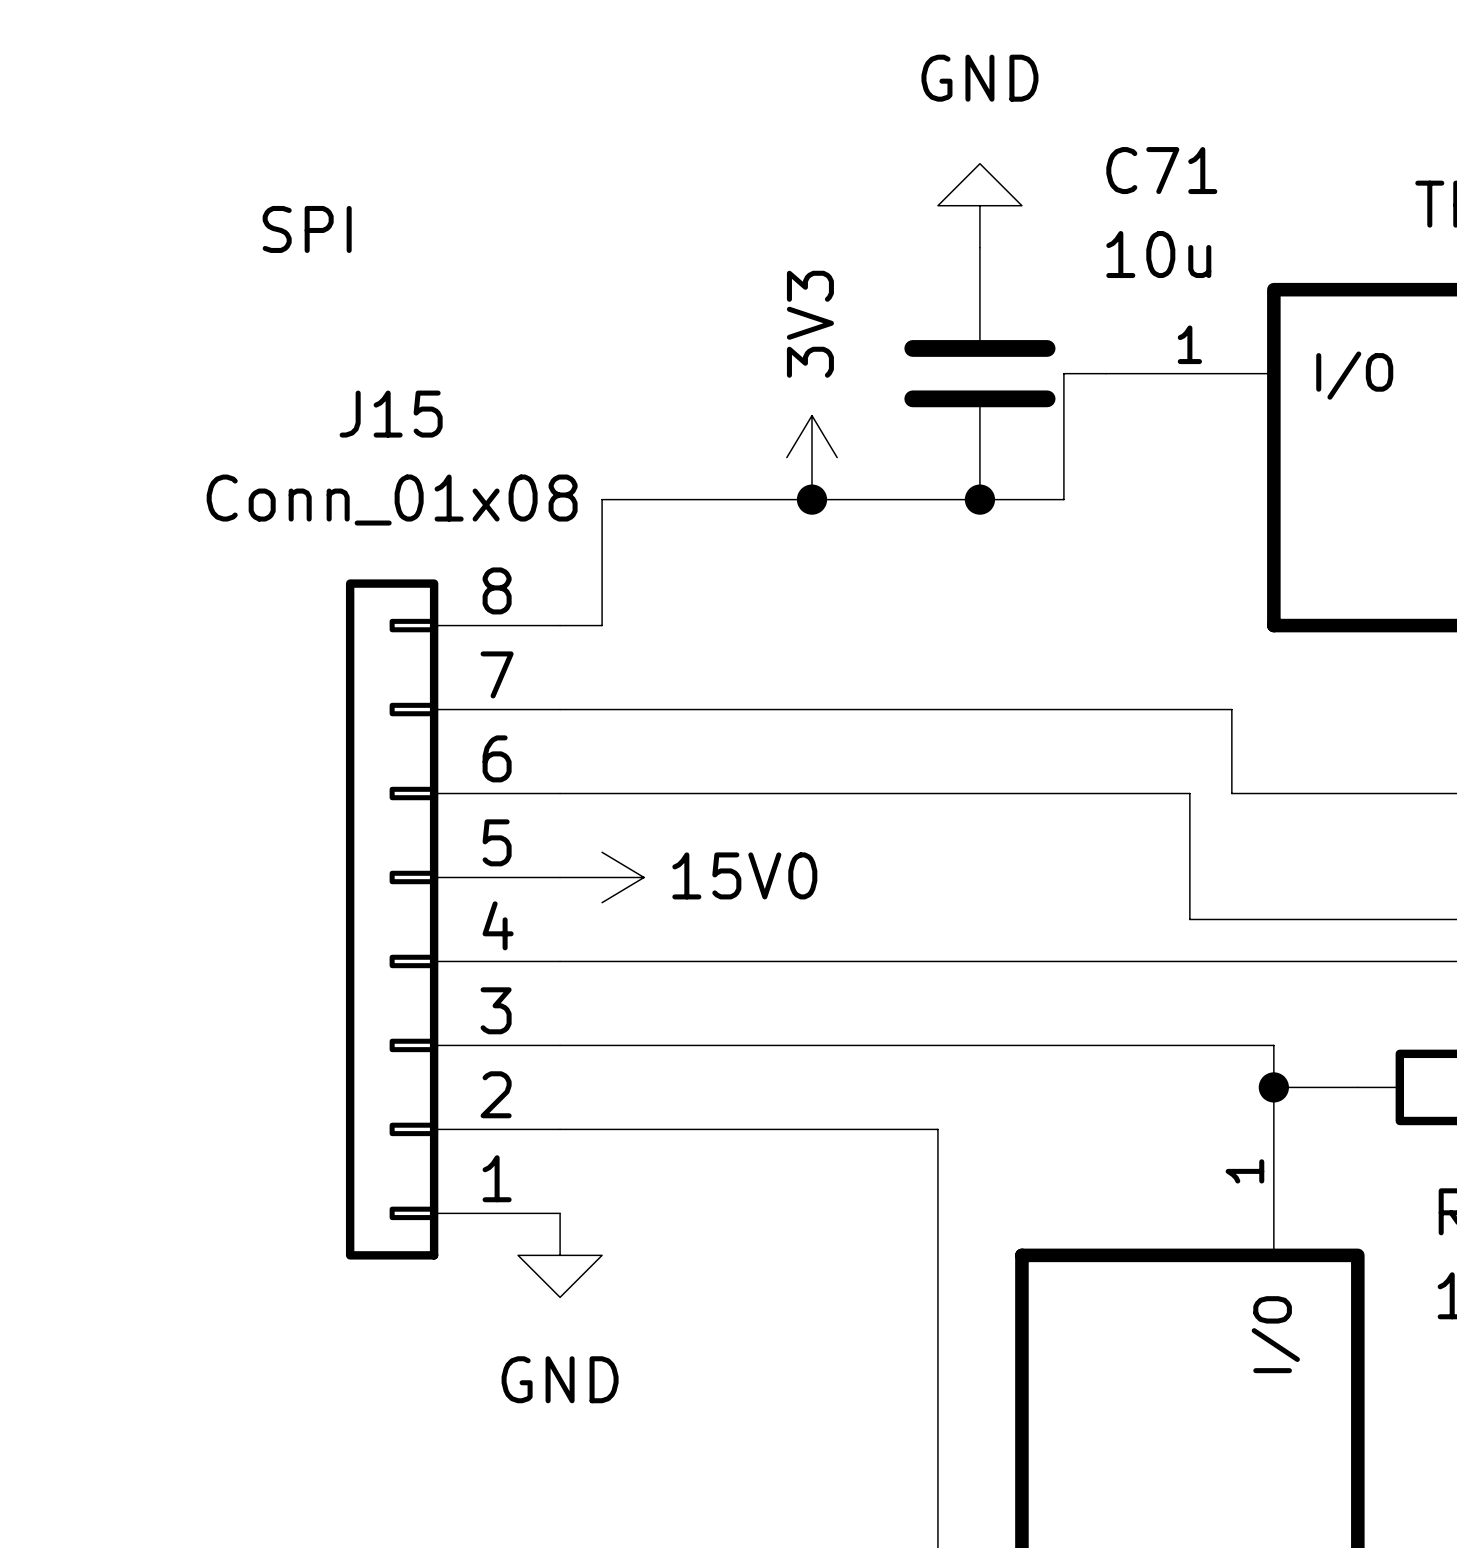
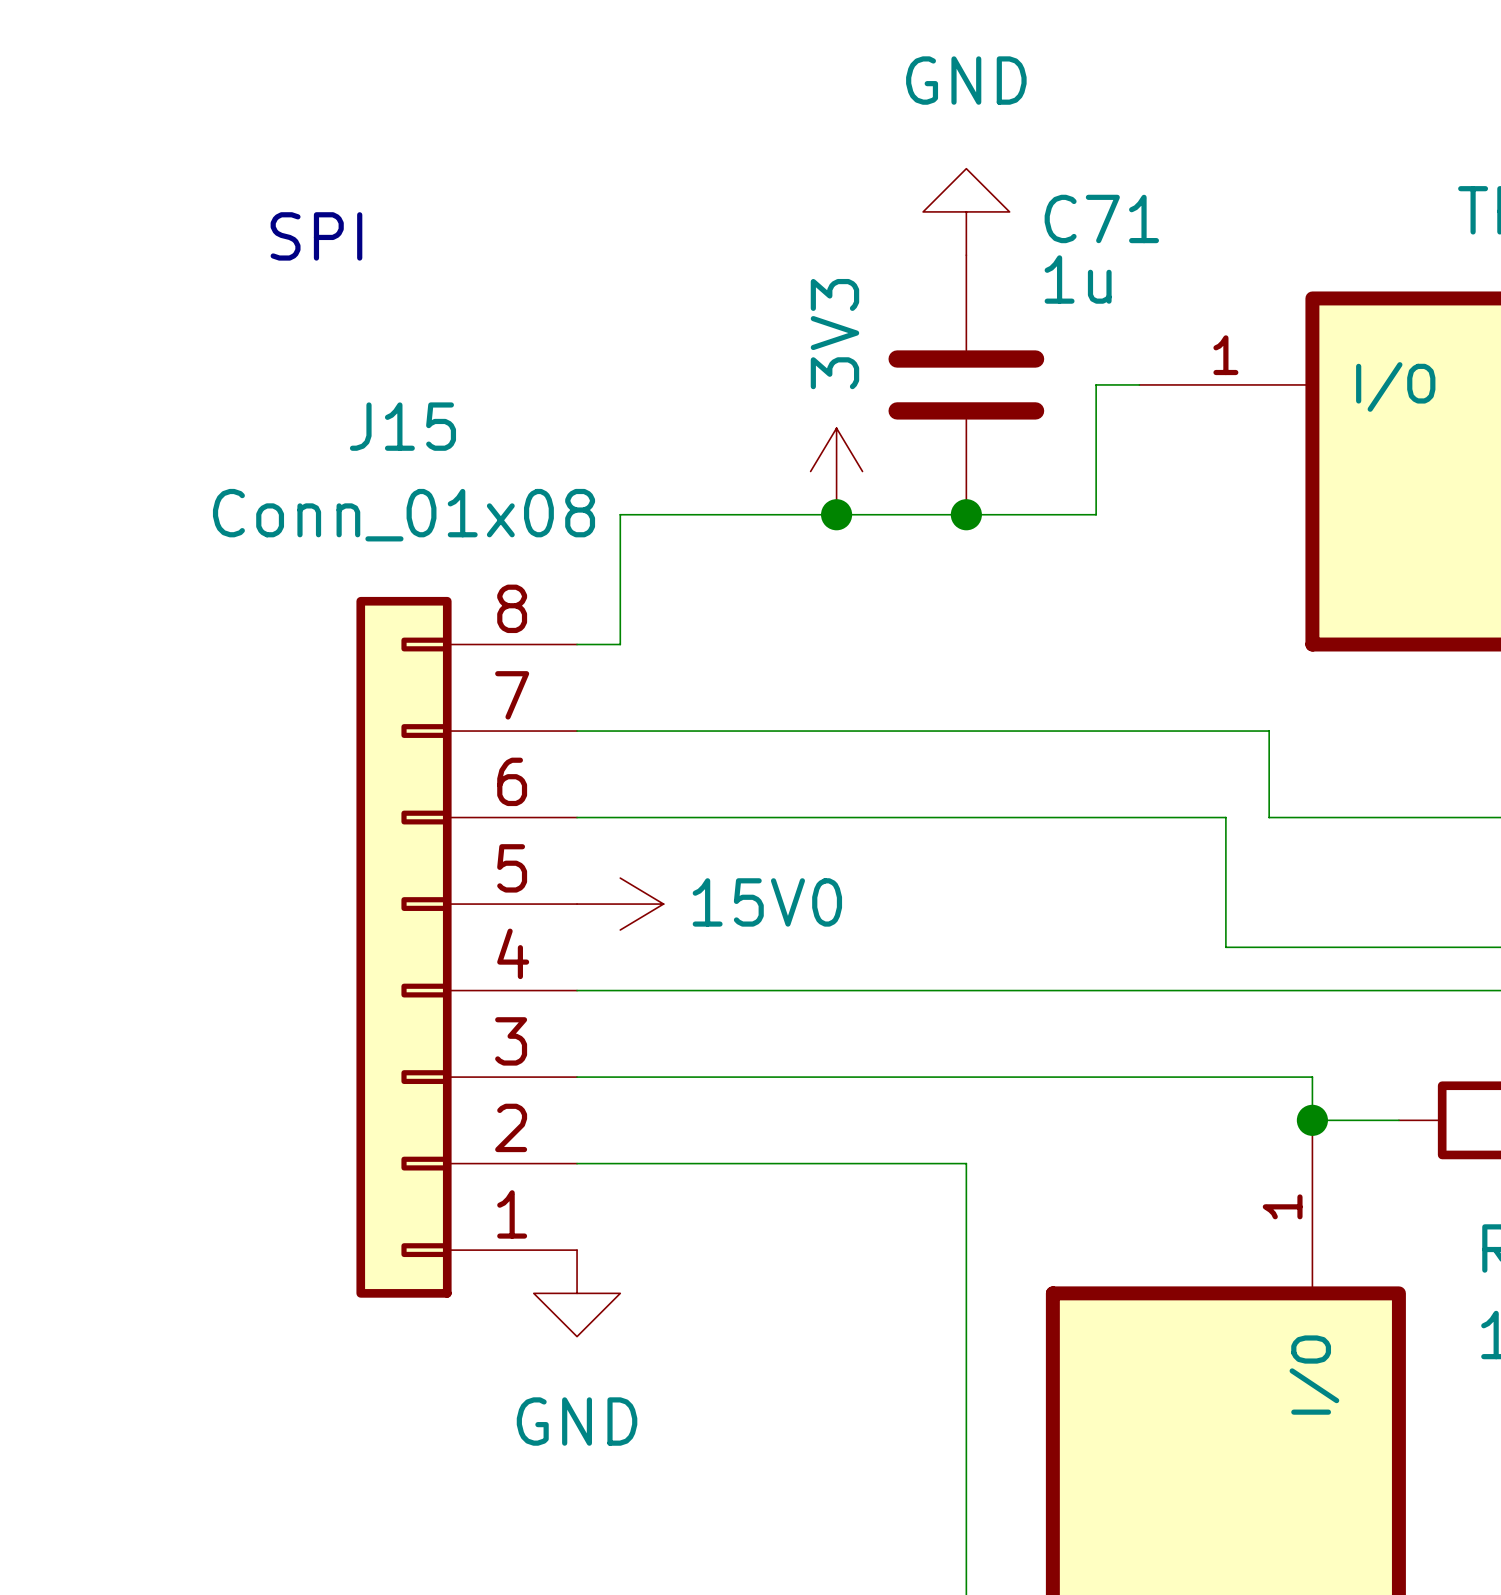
C71 name position: C71 (1161, 170) -> C71 (1101, 218)
power symbol position: GND (979, 205) -> GND (966, 211)
C71 value: 10u (1158, 254) -> 1u (1078, 279)
C71 position: (979, 373) -> (966, 384)
junction position: (979, 499) -> (966, 514)

